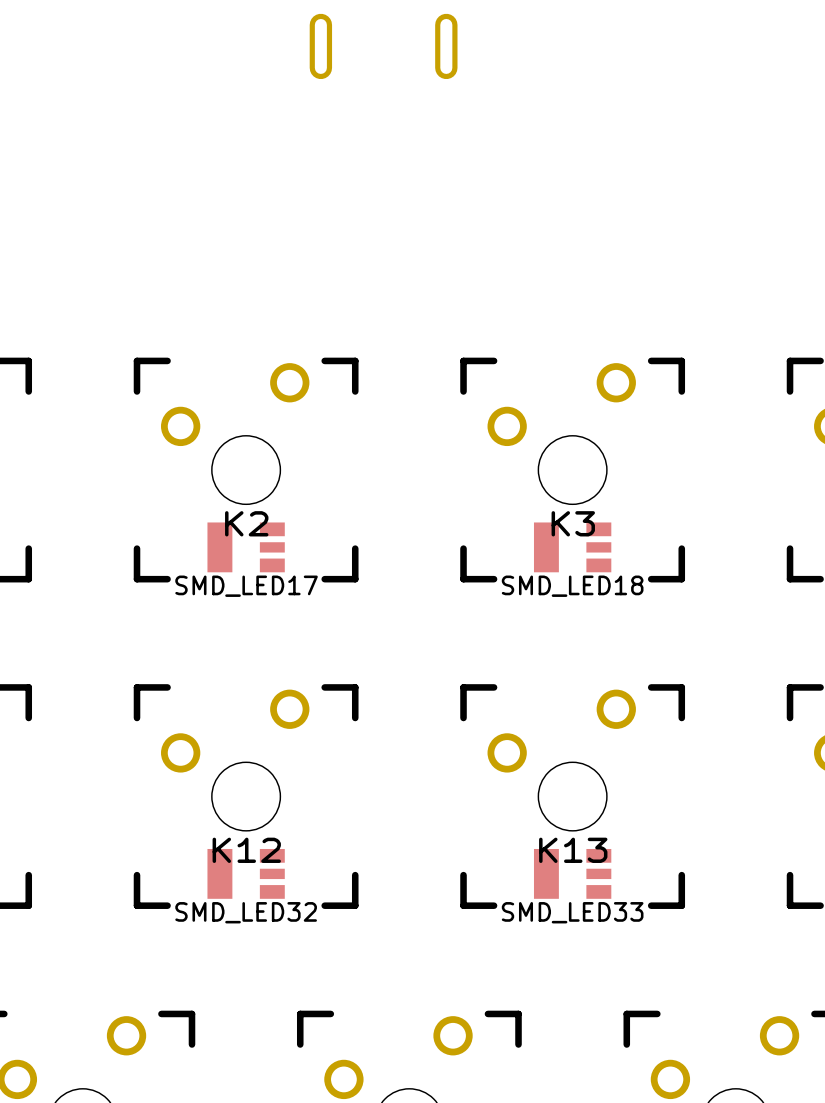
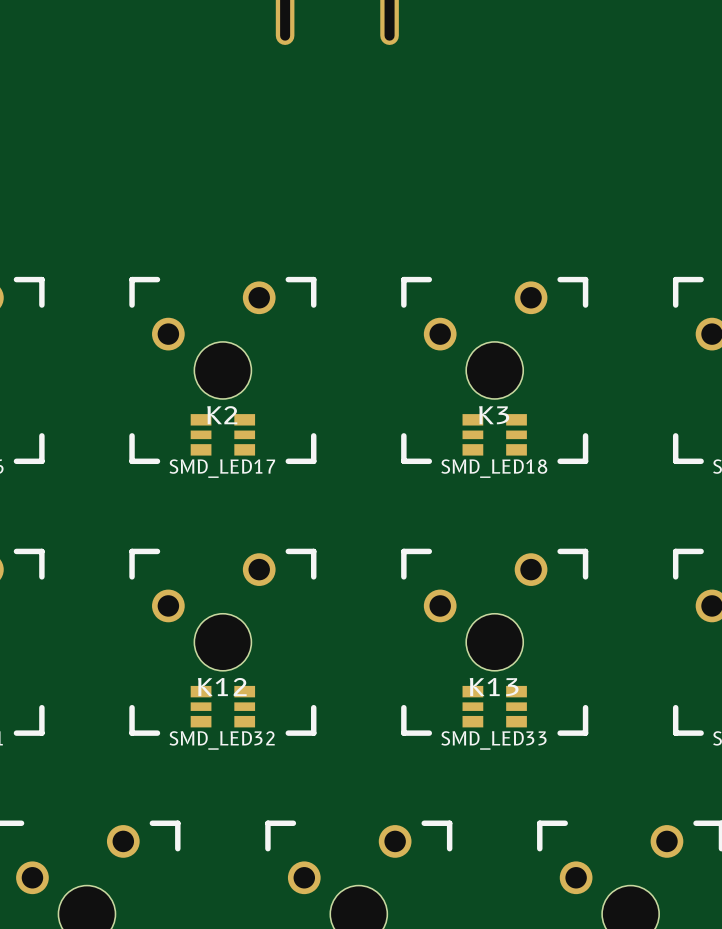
SMD_LED17 footprint: [207, 522, 285, 573] -> [190, 414, 256, 456]
SMD_LED18 footprint: [533, 522, 612, 573] -> [462, 414, 527, 456]
SMD_LED32 footprint: [207, 848, 285, 899] -> [190, 685, 256, 728]
SMD_LED33 footprint: [533, 848, 612, 899] -> [462, 685, 527, 728]

